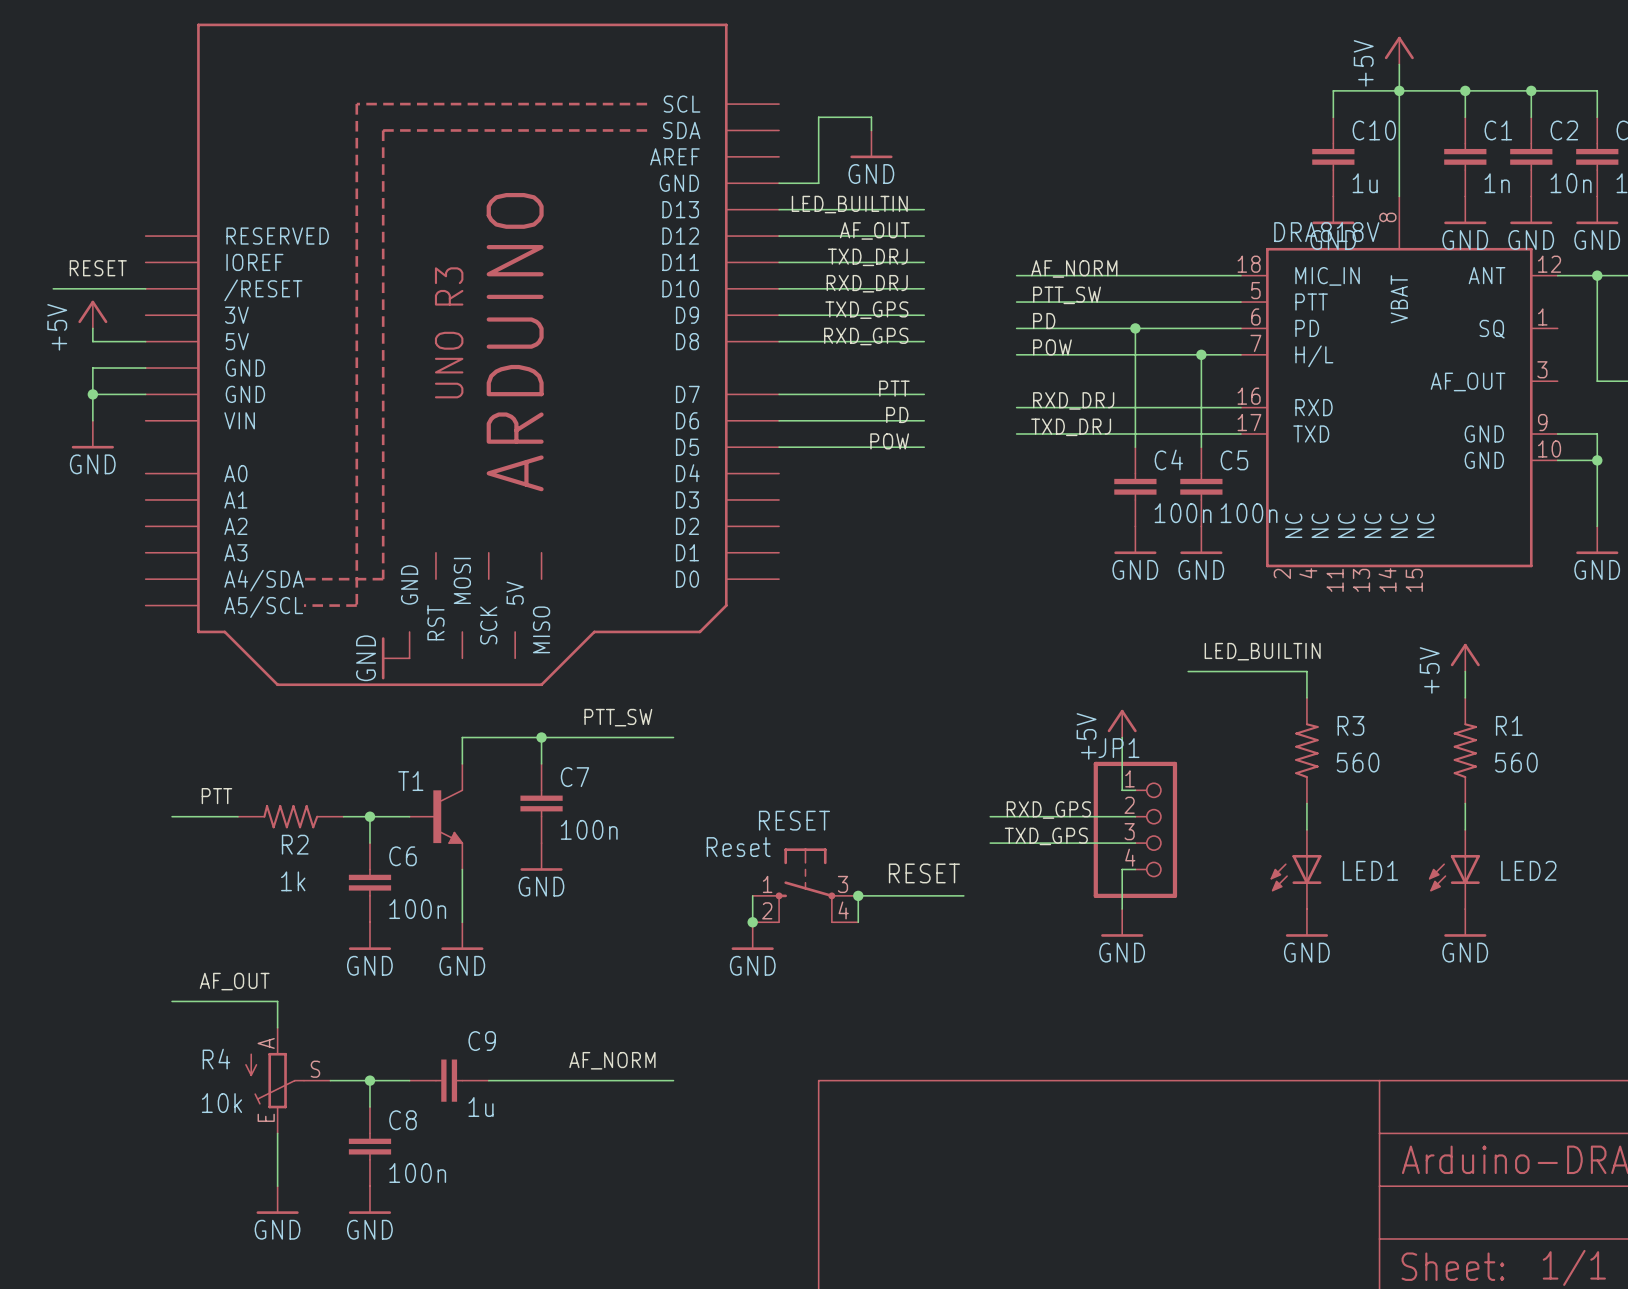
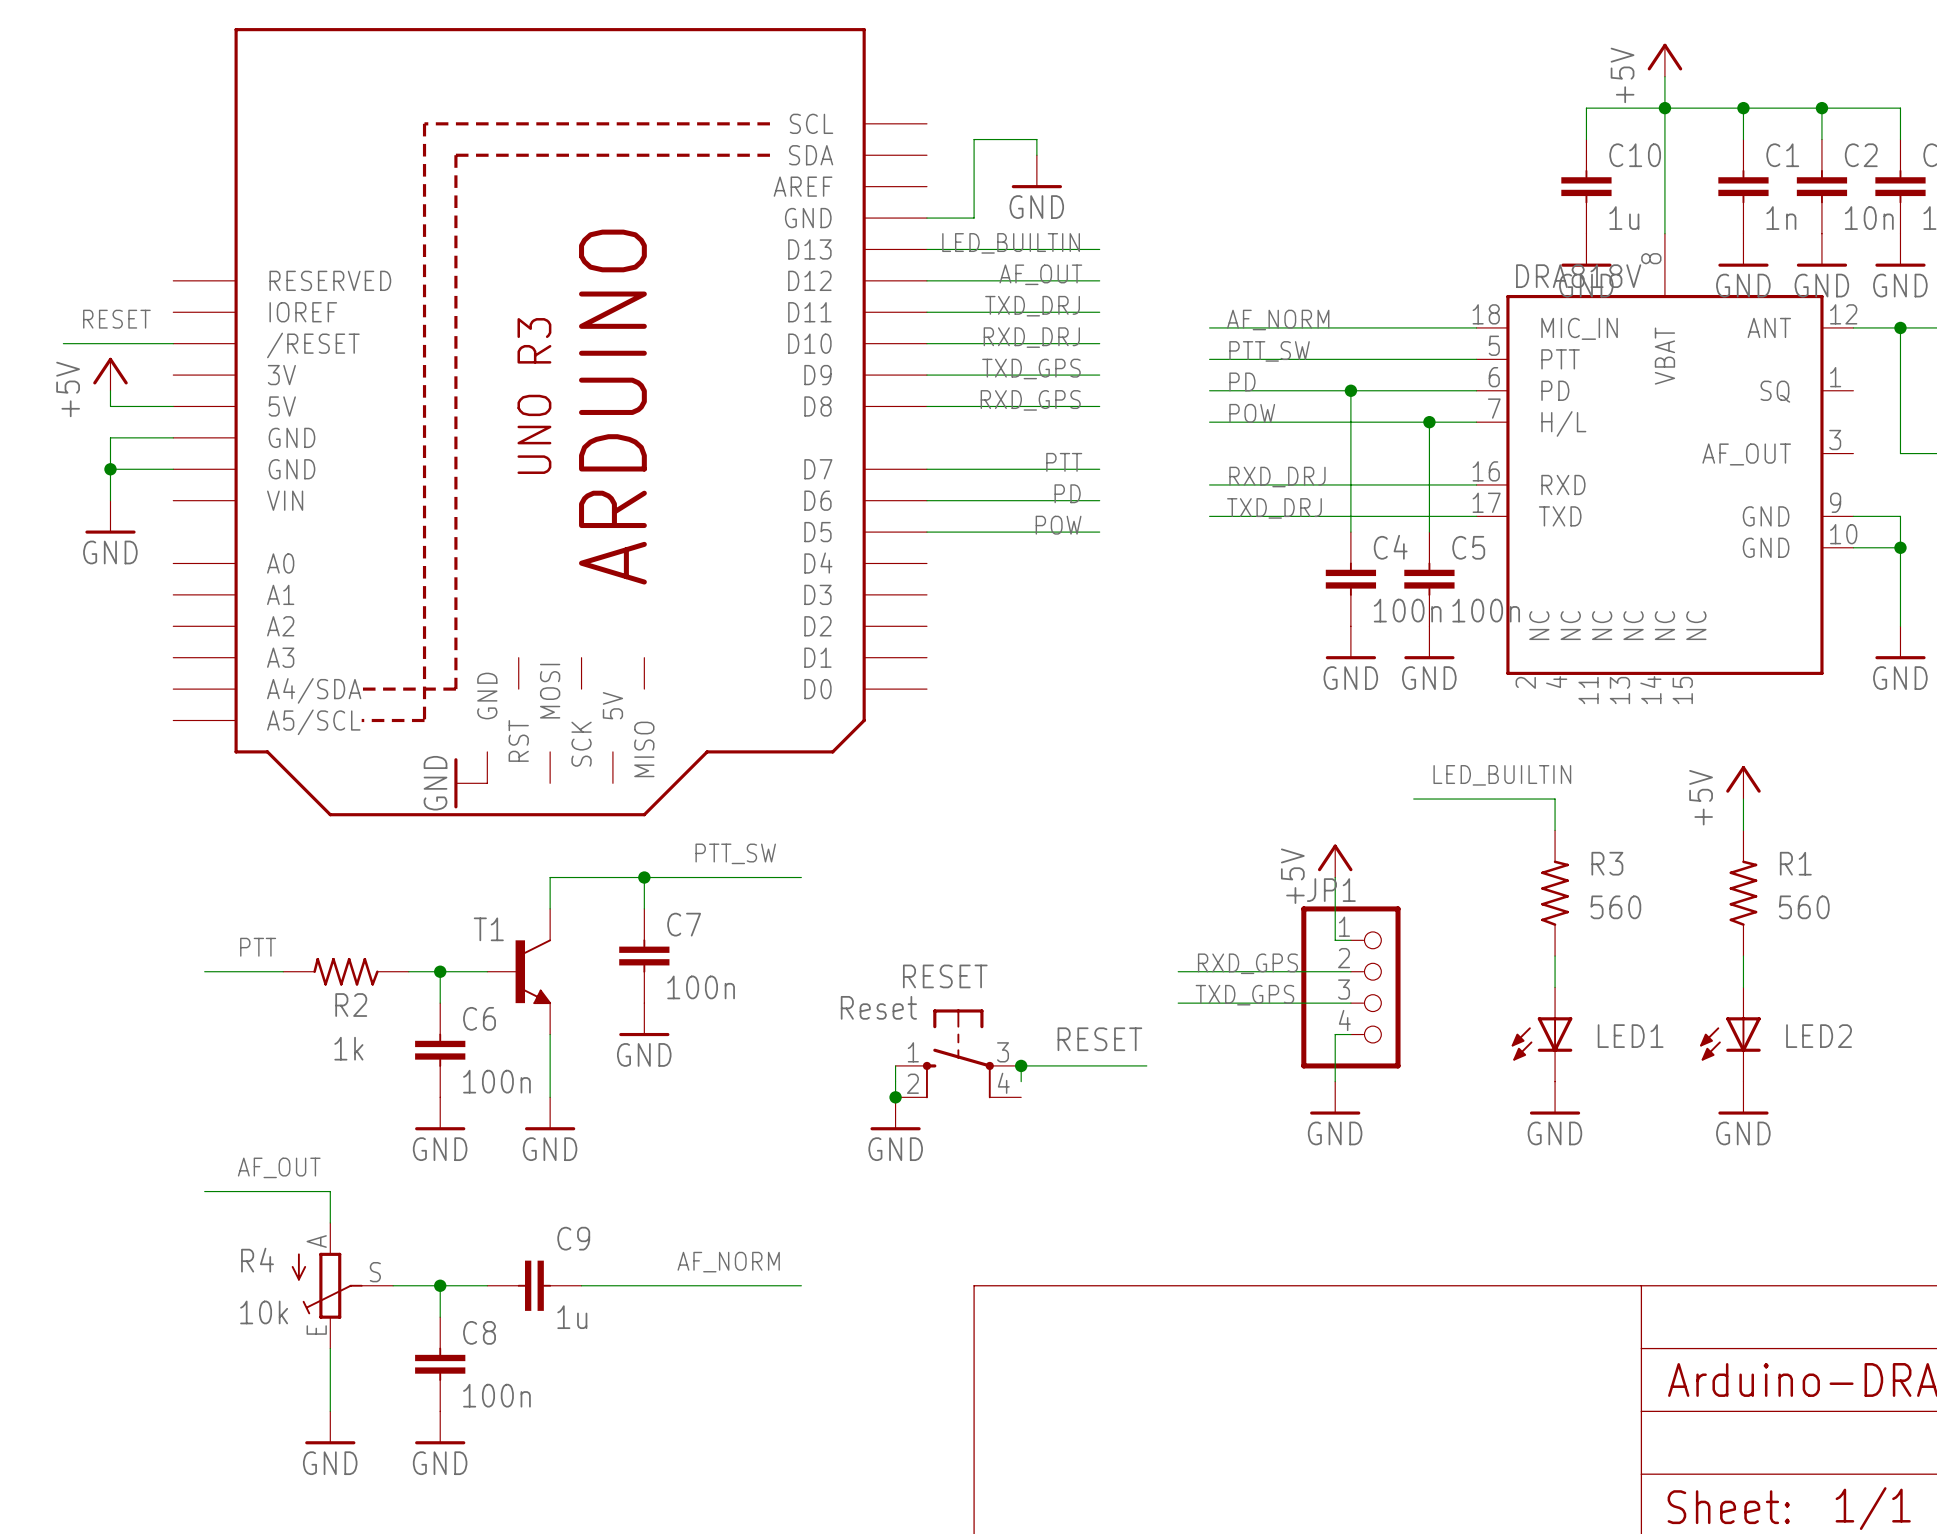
wire: (858, 909) (858, 922) -> none

